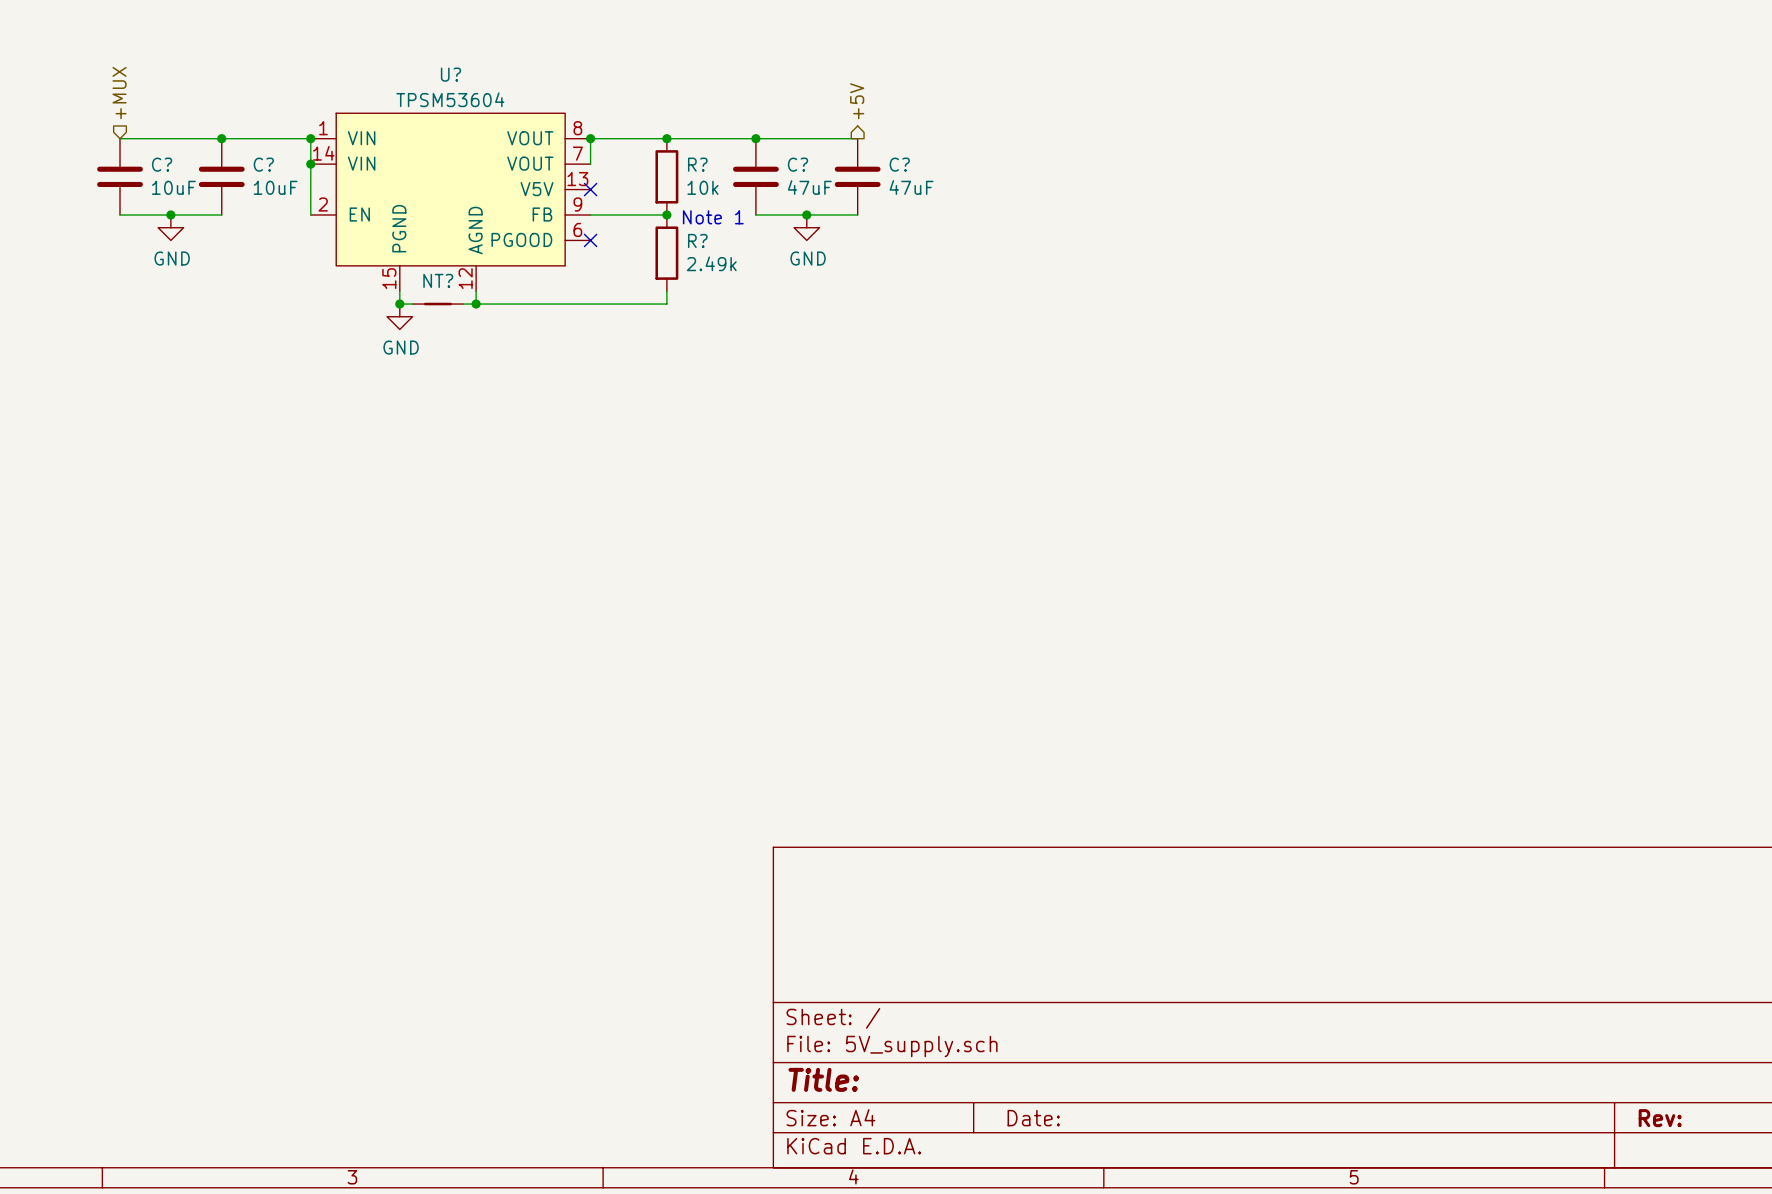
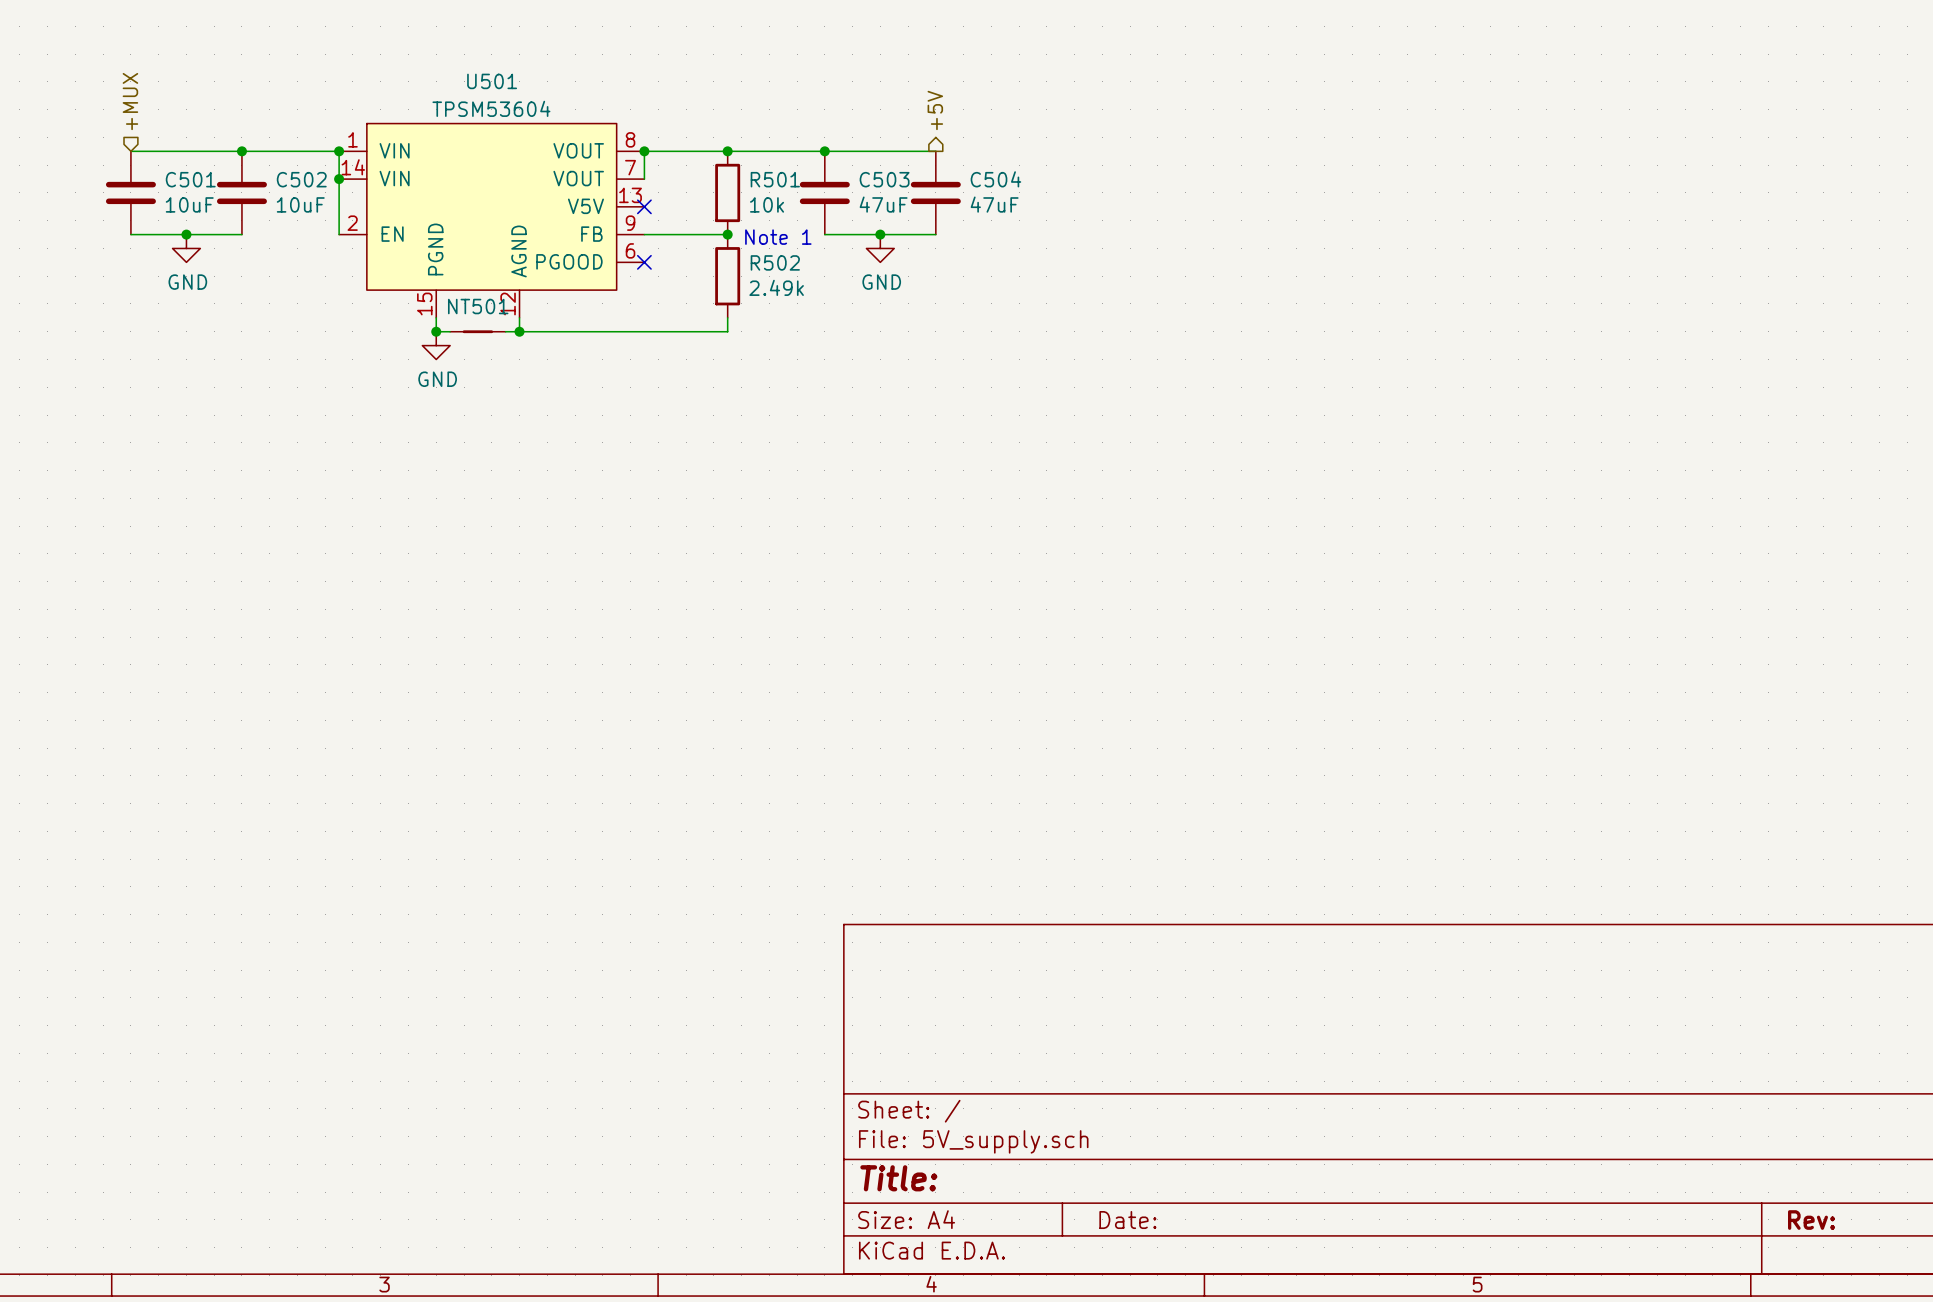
U? name: U? (450, 74) -> U501 (492, 81)
C? name: C? (162, 164) -> C501 (190, 179)
C? name: C? (263, 164) -> C502 (301, 179)
R? name: R? (697, 164) -> R501 (775, 179)
C? name: C? (797, 164) -> C503 (884, 179)
C? name: C? (899, 164) -> C504 (995, 179)
R? name: R? (697, 240) -> R502 (775, 262)
NT? name: NT? (438, 280) -> NT501 (478, 306)

